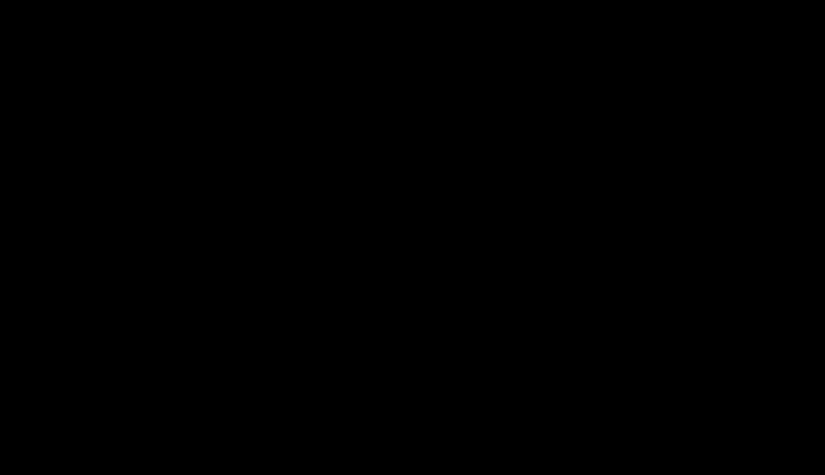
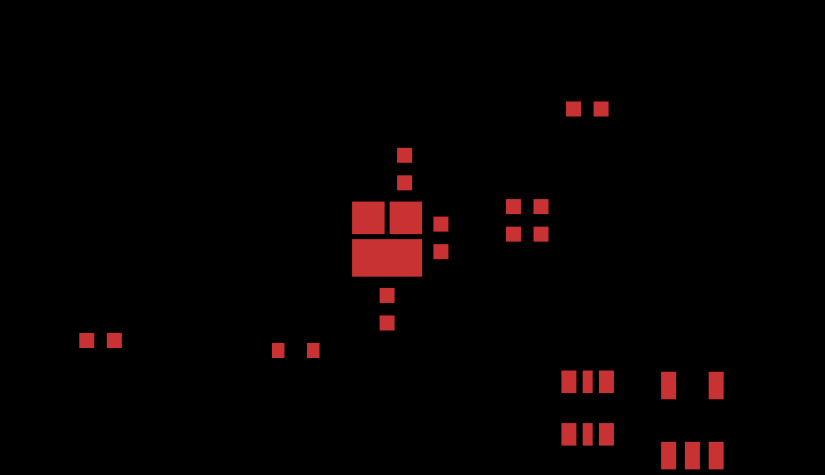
part: none -> (587, 109)
part: none -> (404, 169)
part: none -> (527, 206)
part: none -> (527, 234)
part: none -> (440, 237)
part: none -> (387, 239)
part: none -> (387, 309)
part: none -> (100, 340)
part: none -> (295, 350)
part: none -> (587, 408)
part: none -> (692, 420)

